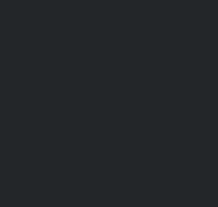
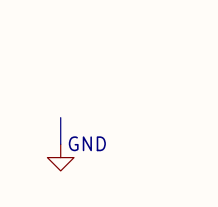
wire: none -> (60, 117) (60, 144)
power symbol: none -> GND (60, 157)

